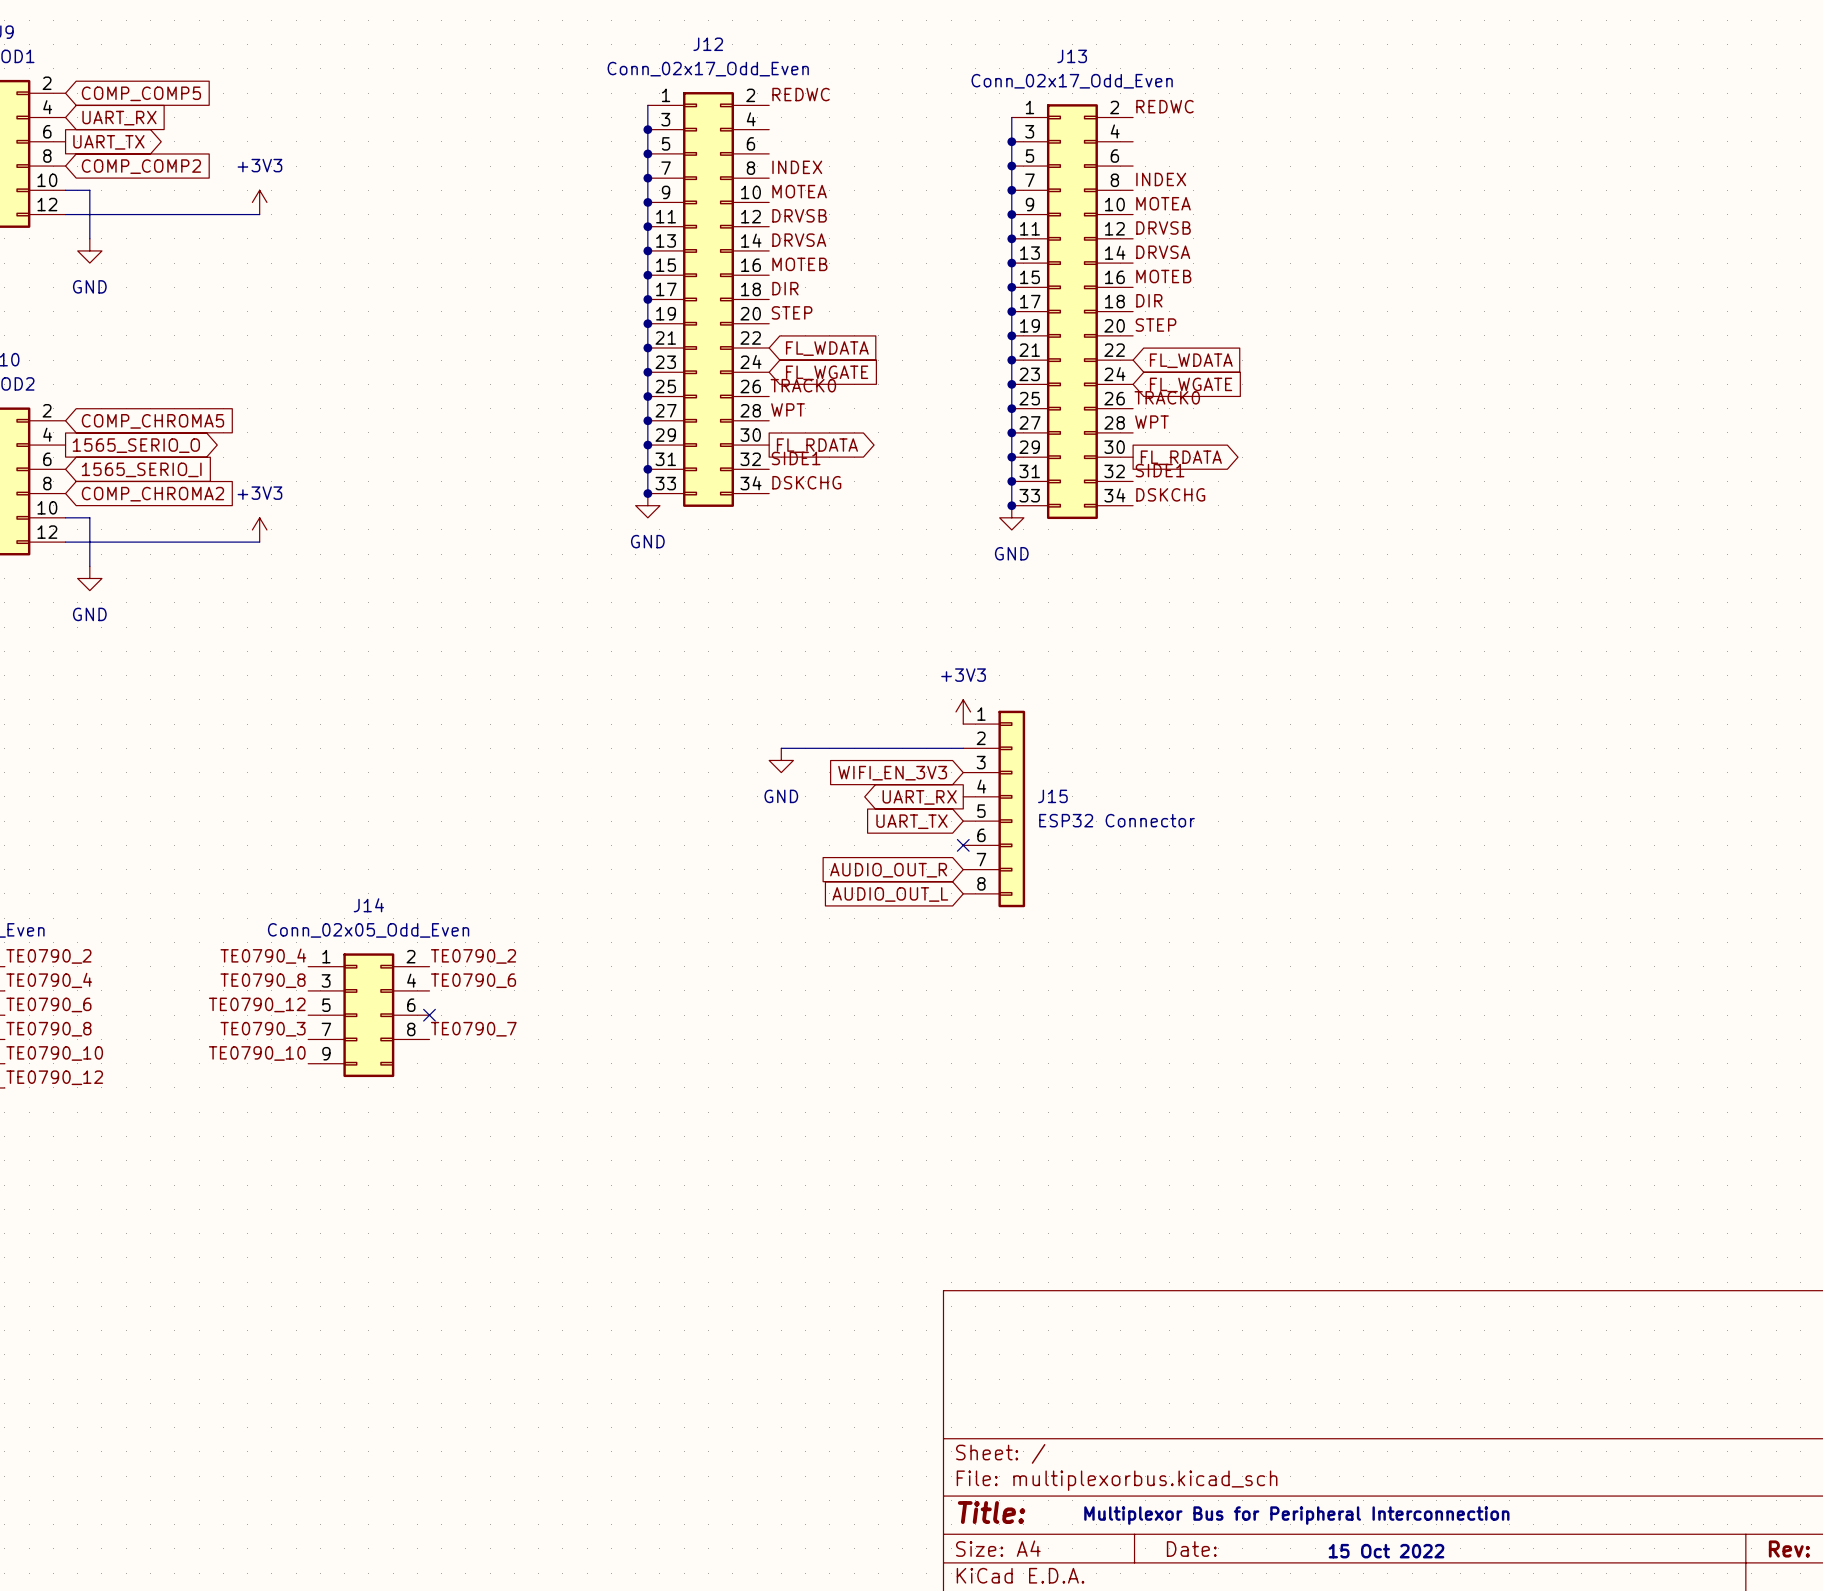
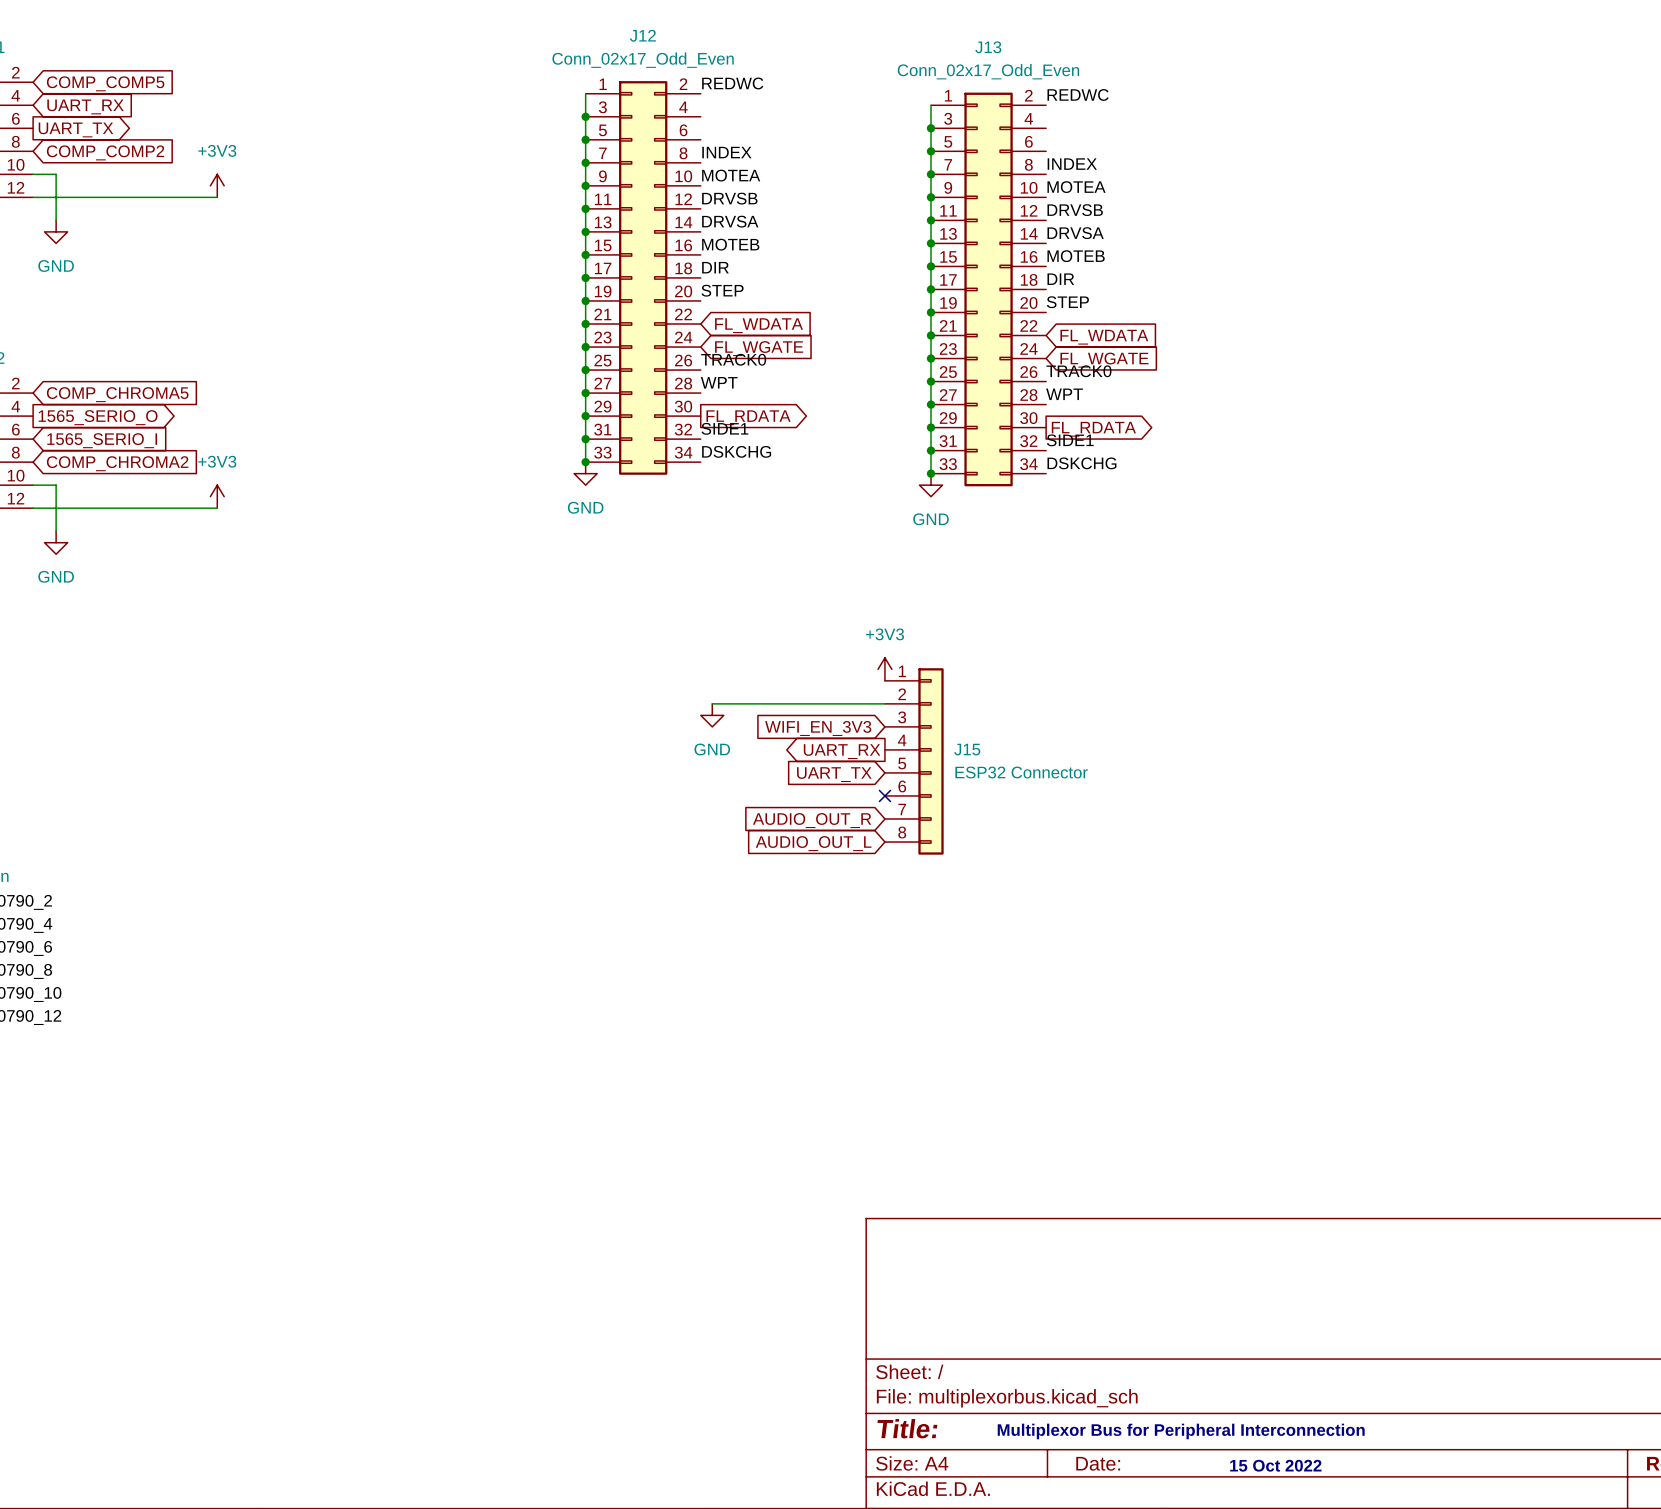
label: TE0790_4 (263, 956) -> none
label: TE0790_2 (473, 956) -> none
label: TE0790_8 (263, 980) -> none
label: TE0790_6 (473, 980) -> none
label: TE0790_12 (257, 1004) -> none
J14: Conn_02x05_Odd_Even (368, 1015) -> none
no-connect mark: (429, 1015) -> none
label: TE0790_3 (263, 1029) -> none
label: TE0790_7 (473, 1029) -> none
label: TE0790_10 (257, 1053) -> none

